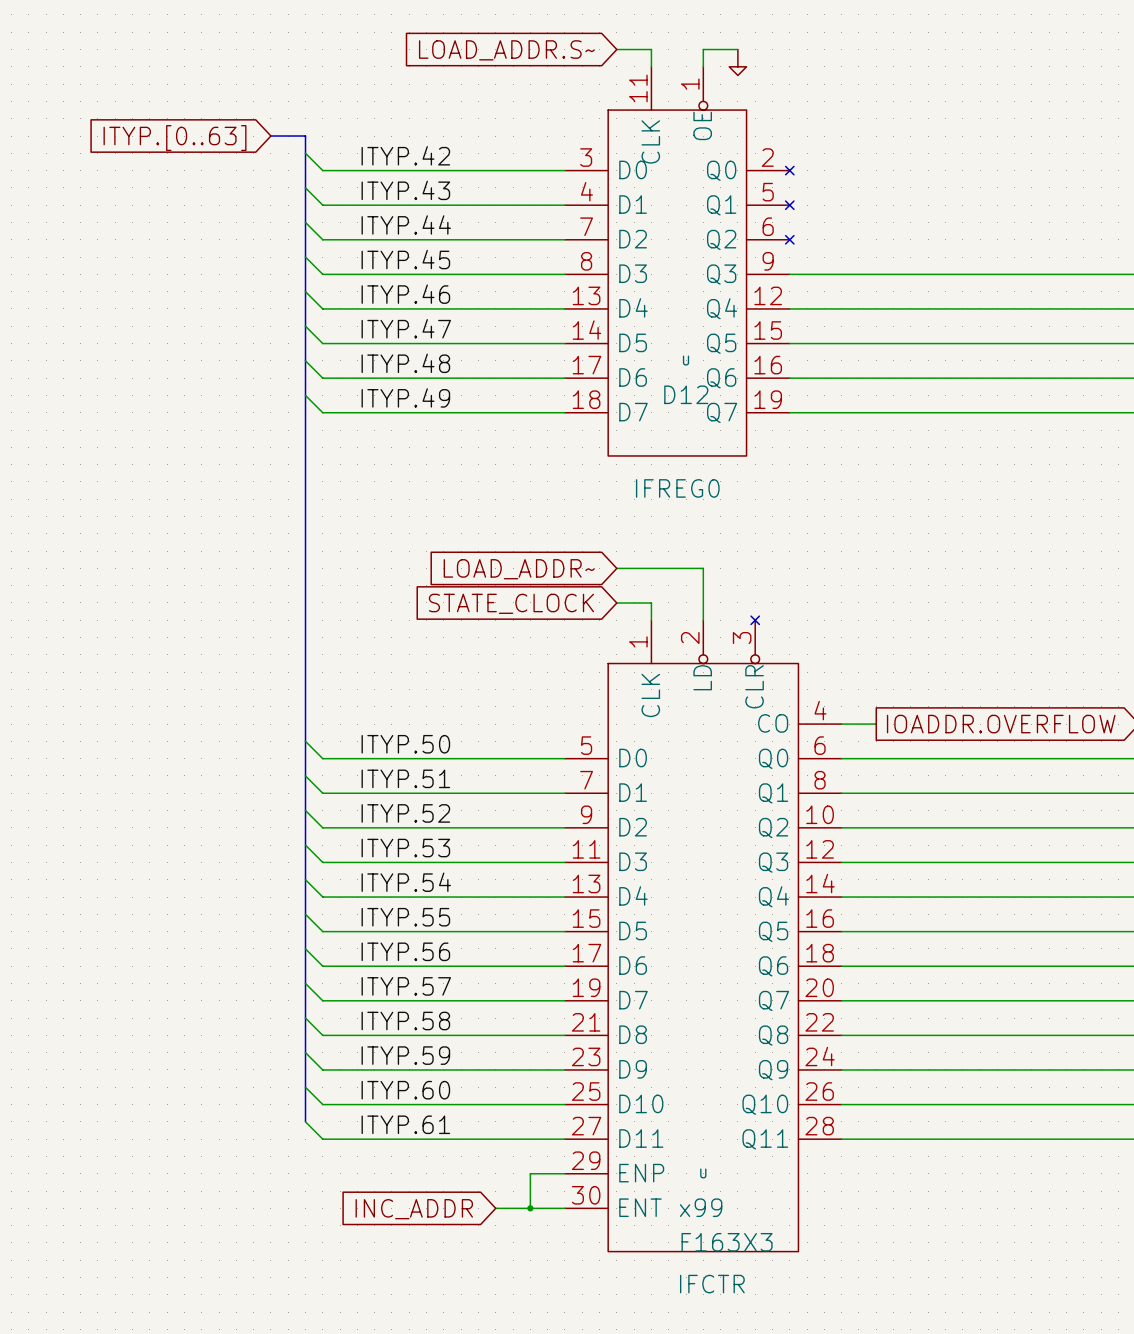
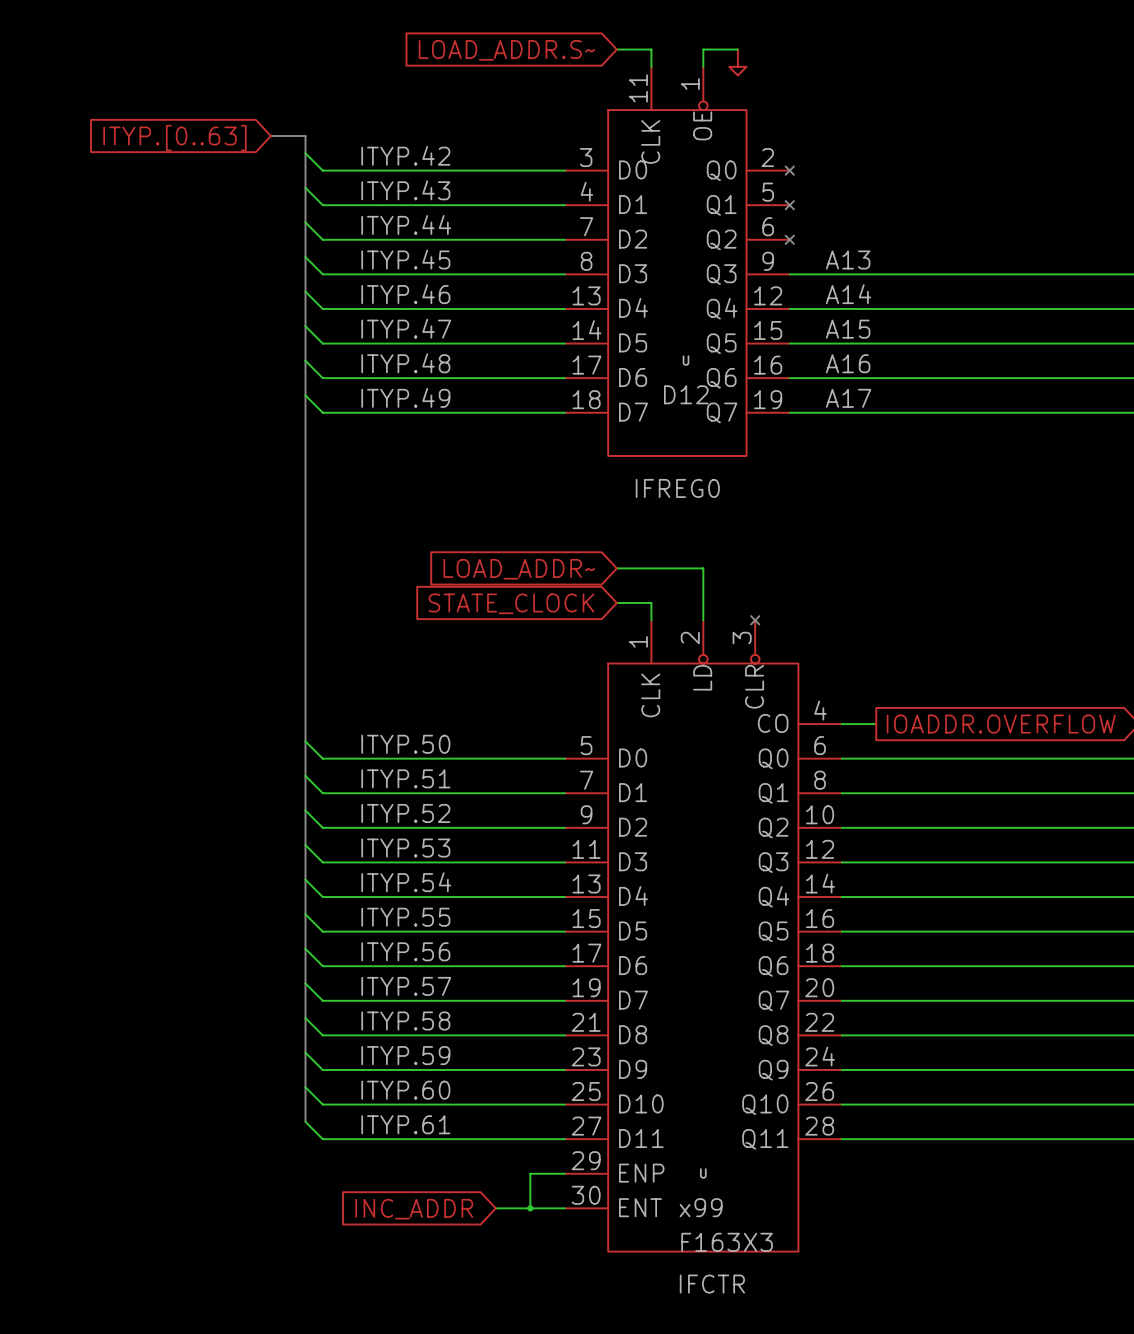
label: none -> A13 (848, 259)
label: none -> A14 (848, 294)
label: none -> A15 (848, 329)
label: none -> A16 (848, 363)
label: none -> A17 (848, 398)

